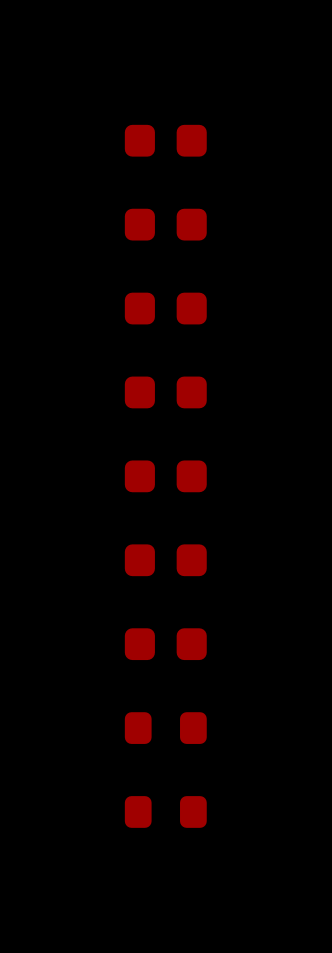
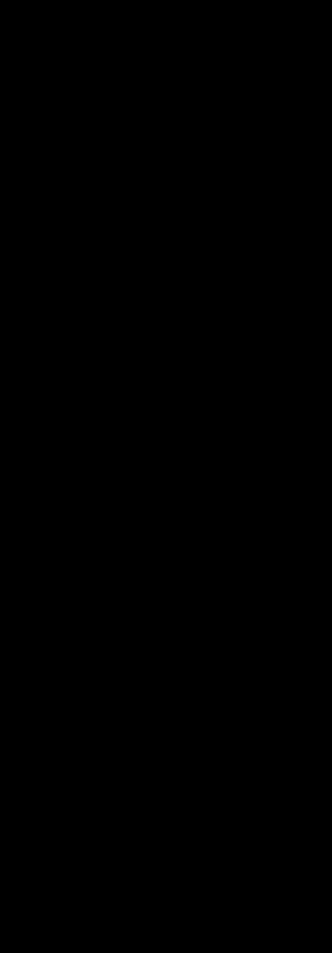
part: (165, 140) -> none
part: (165, 224) -> none
part: (165, 308) -> none
part: (165, 392) -> none
part: (165, 476) -> none
part: (165, 560) -> none
part: (165, 644) -> none
part: (165, 728) -> none
part: (165, 811) -> none

